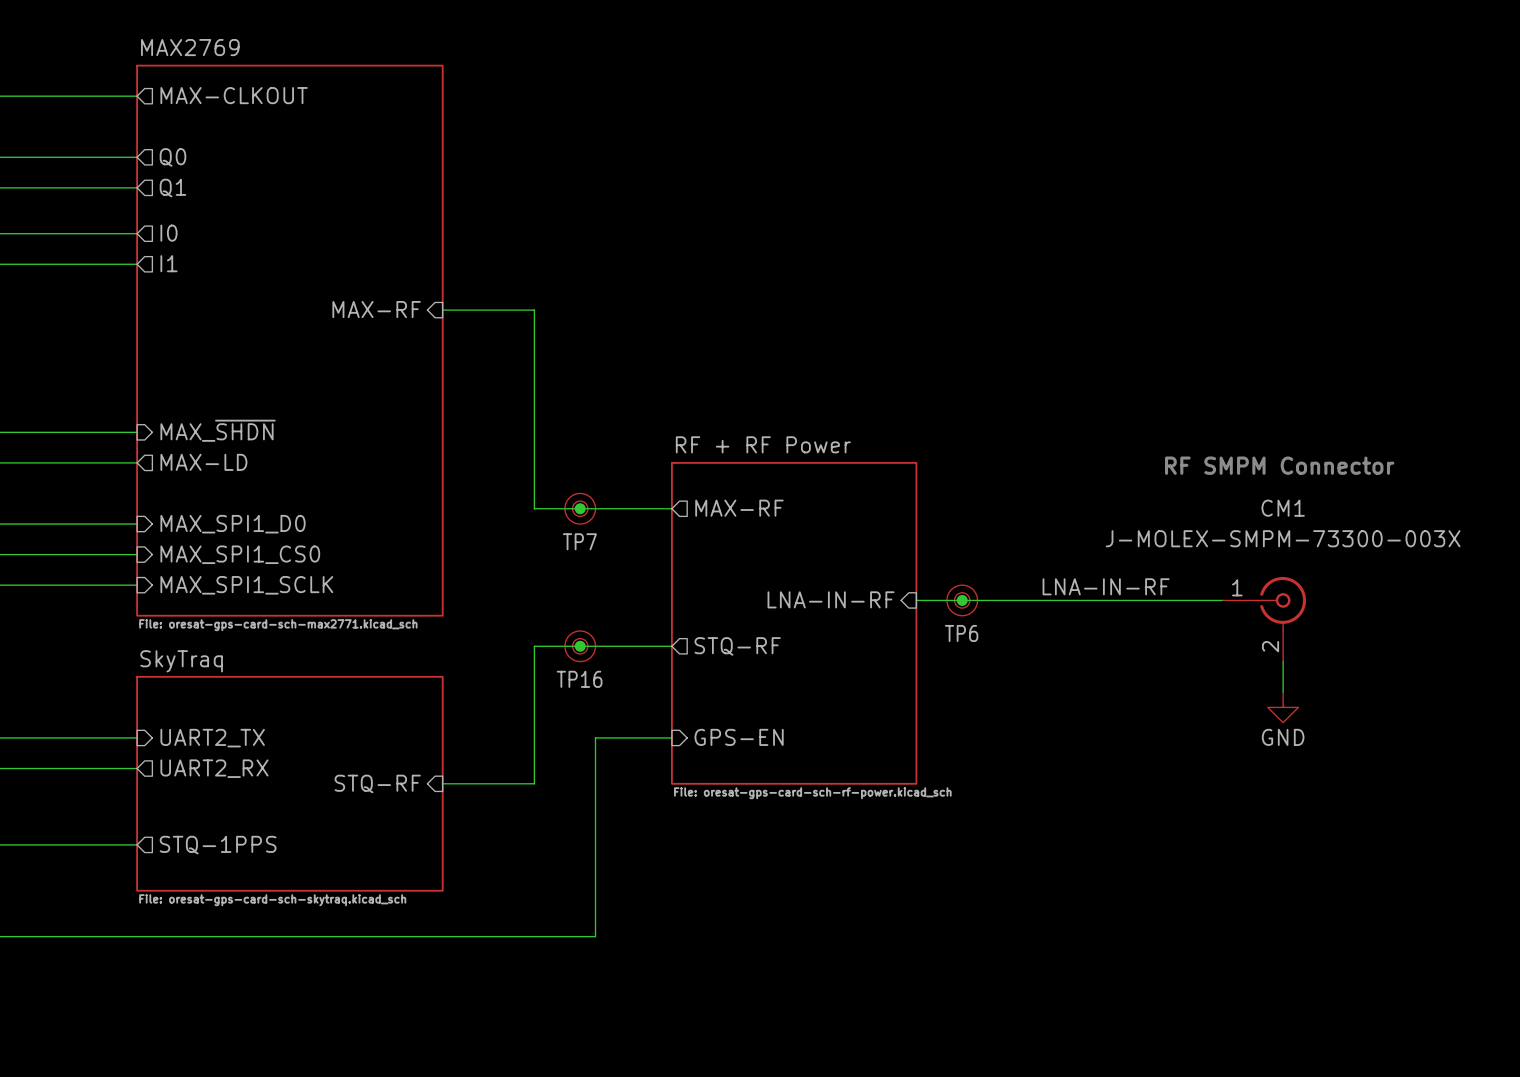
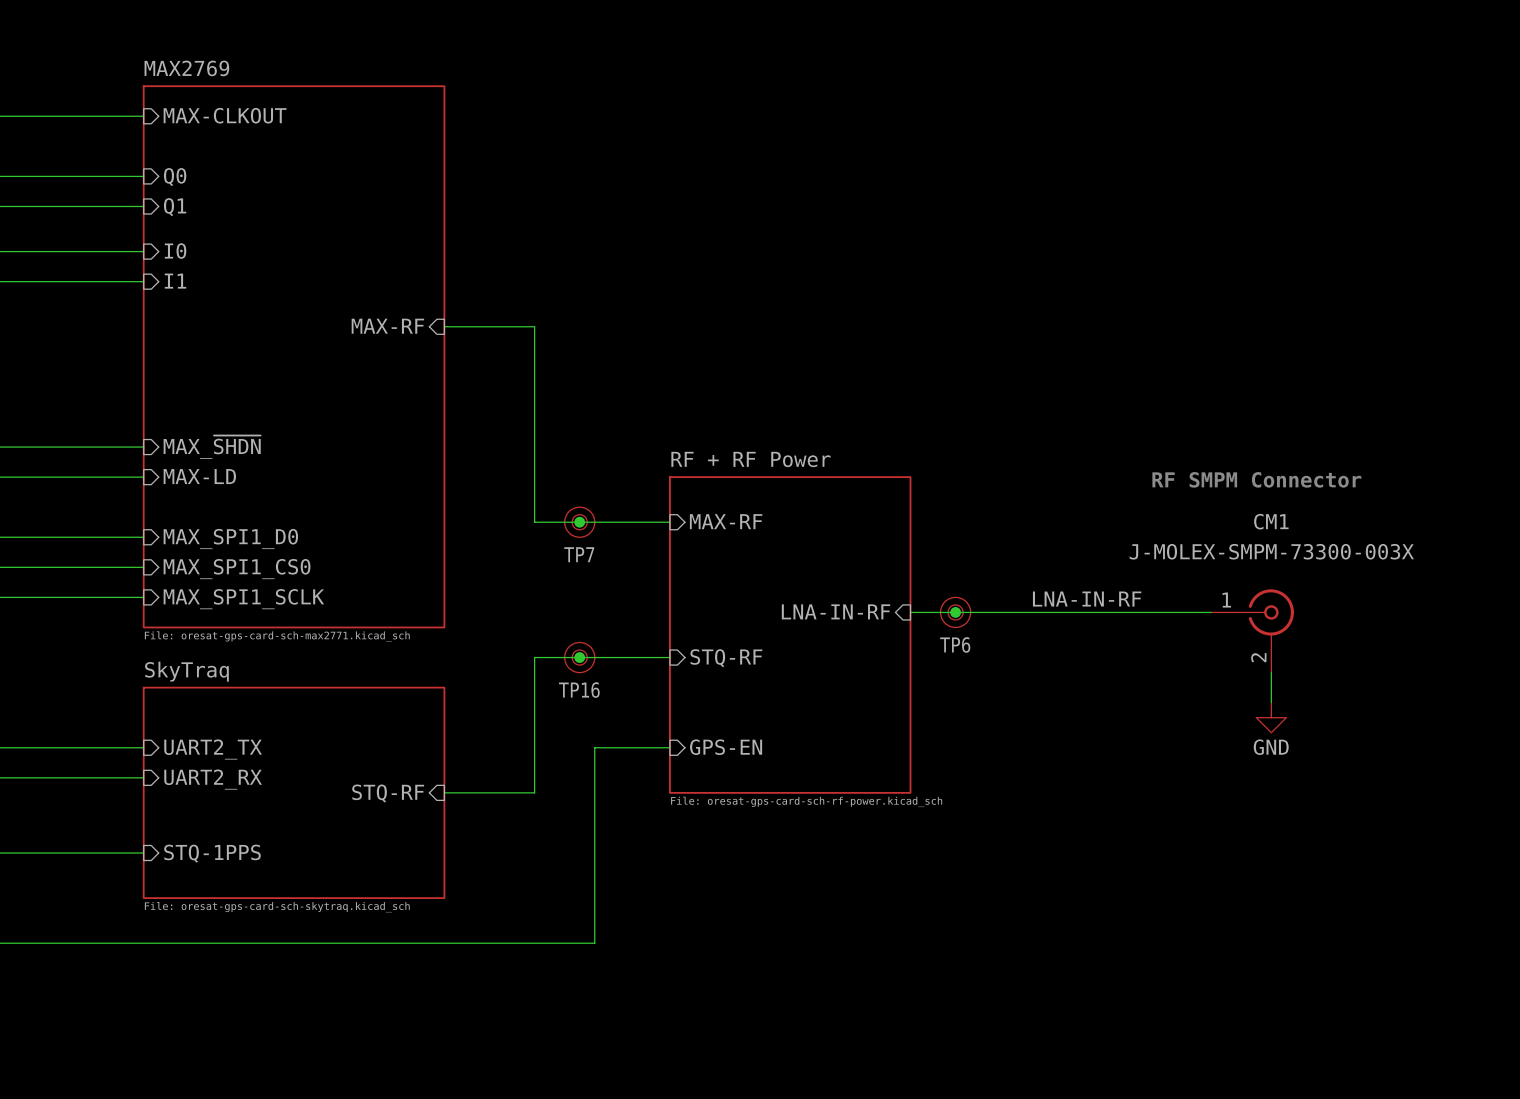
sheet pin shape: output (234, 95) -> input (225, 115)
sheet pin shape: output (172, 157) -> input (175, 177)
sheet pin shape: output (172, 188) -> input (175, 207)
sheet pin shape: output (168, 233) -> input (175, 251)
sheet pin shape: output (168, 263) -> input (175, 281)
sheet pin shape: output (203, 462) -> input (199, 476)
sheet pin shape: output (739, 508) -> input (726, 521)
sheet pin shape: output (737, 646) -> input (726, 658)
sheet pin shape: output (214, 768) -> input (213, 779)
sheet pin shape: output (218, 845) -> input (212, 853)

